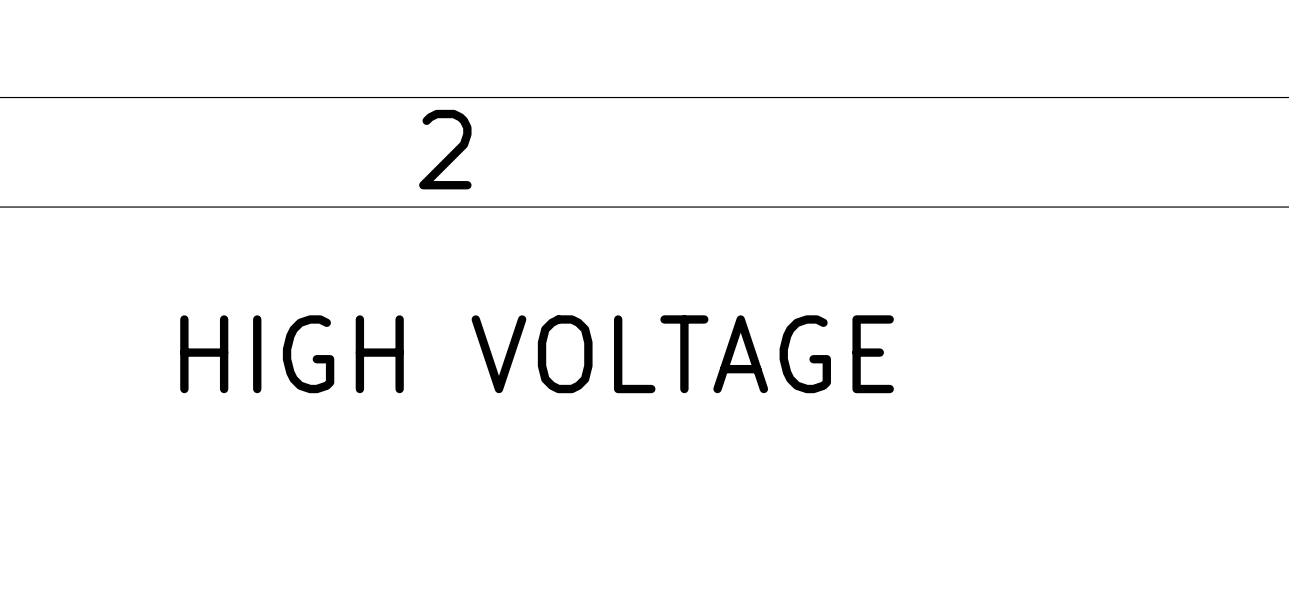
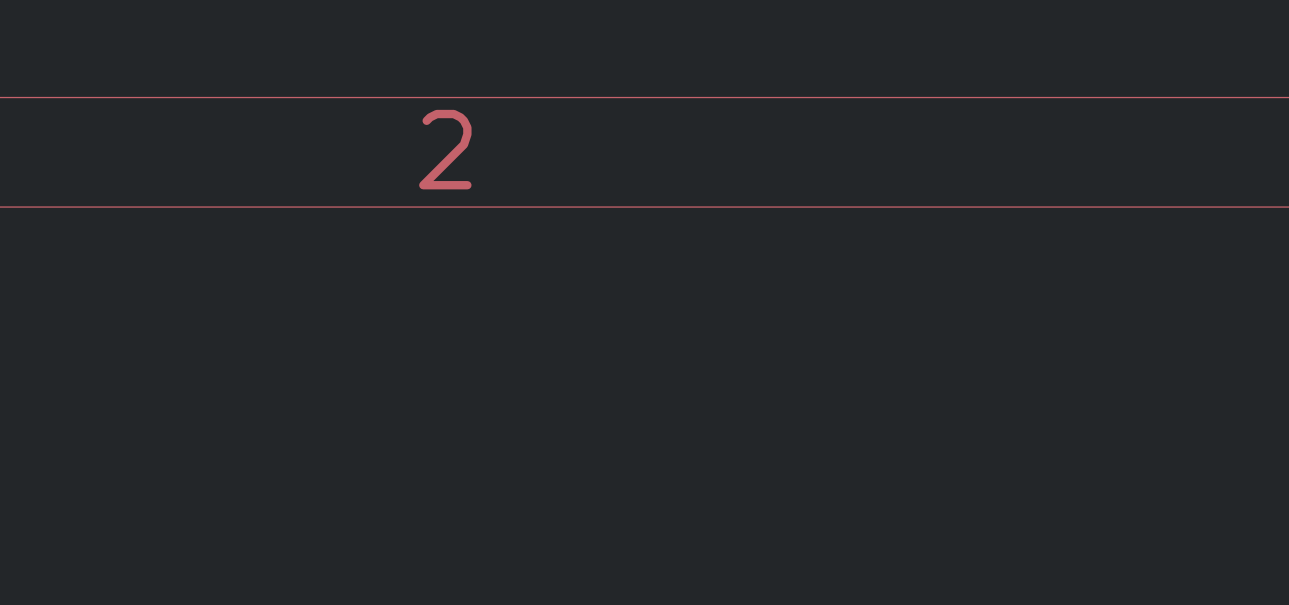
text: HIGH VOLTAGE (537, 354) -> none

